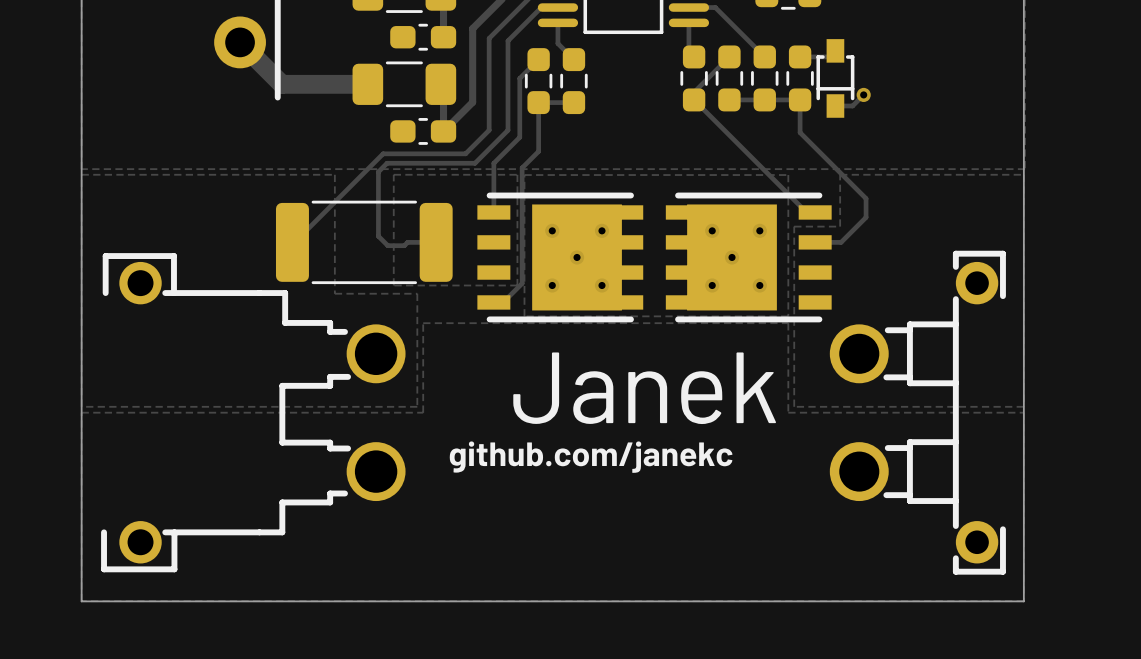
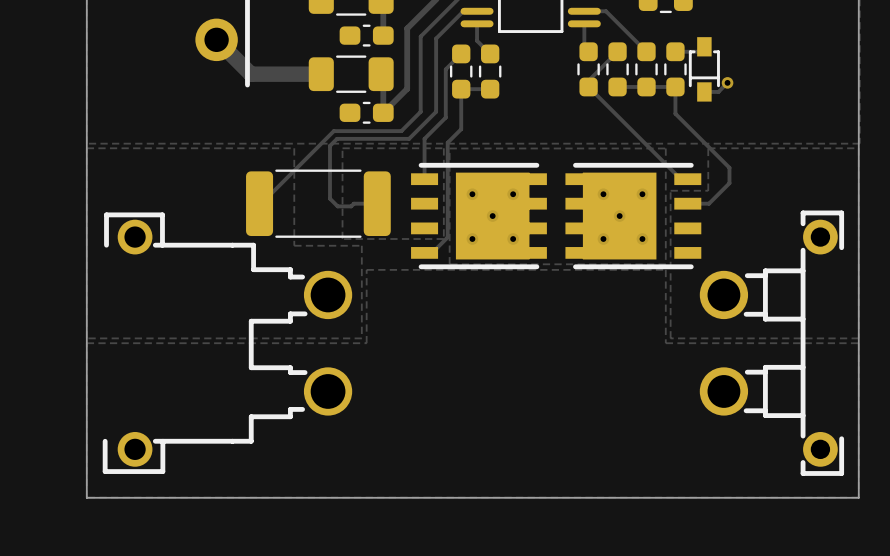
text: Janek (644, 388) -> none
text: github.com/janekc (591, 457) -> none

